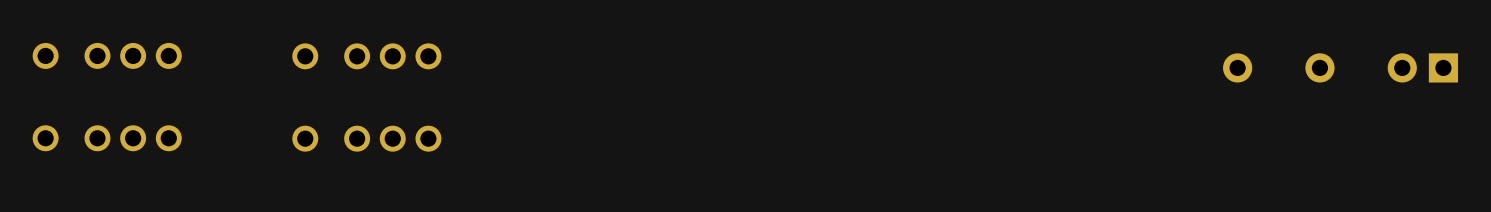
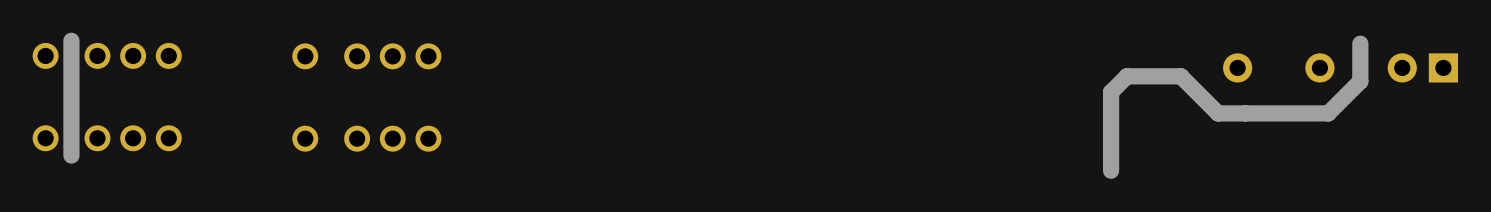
board edge: none -> (71, 40) (71, 155)
board edge: none -> (1360, 43) (1360, 81) (1328, 113) (1218, 113) (1180, 76) (1126, 76) (1111, 92) (1111, 170)

